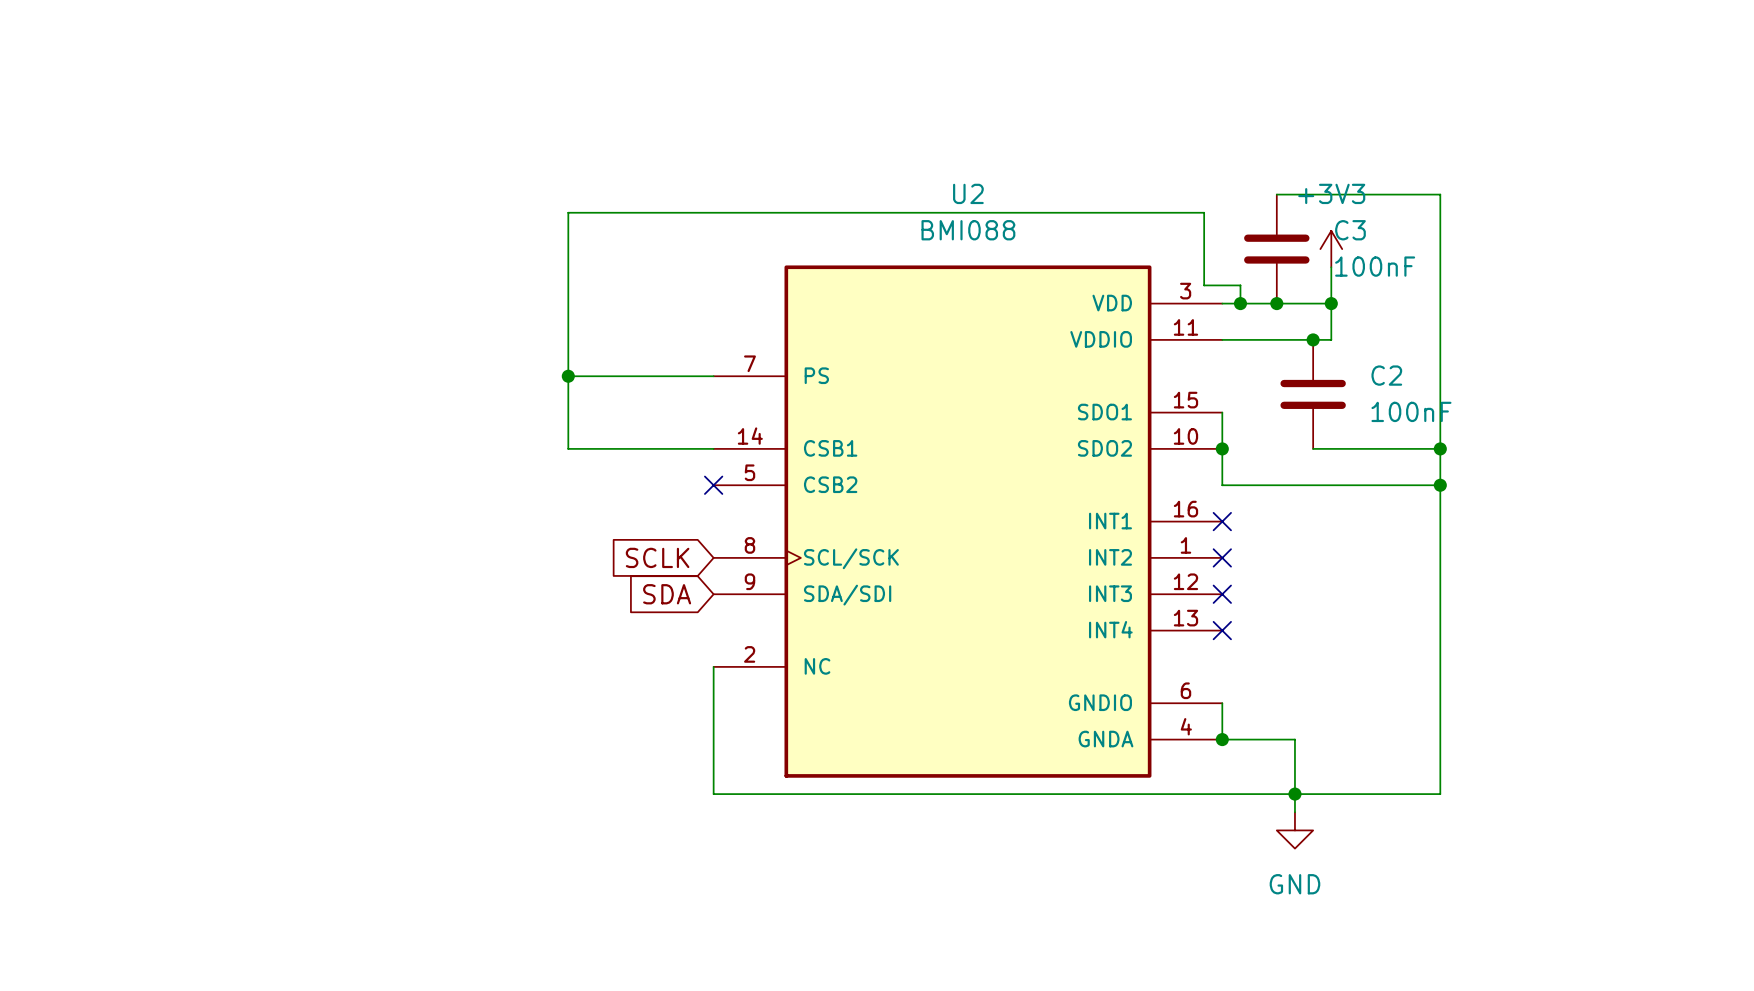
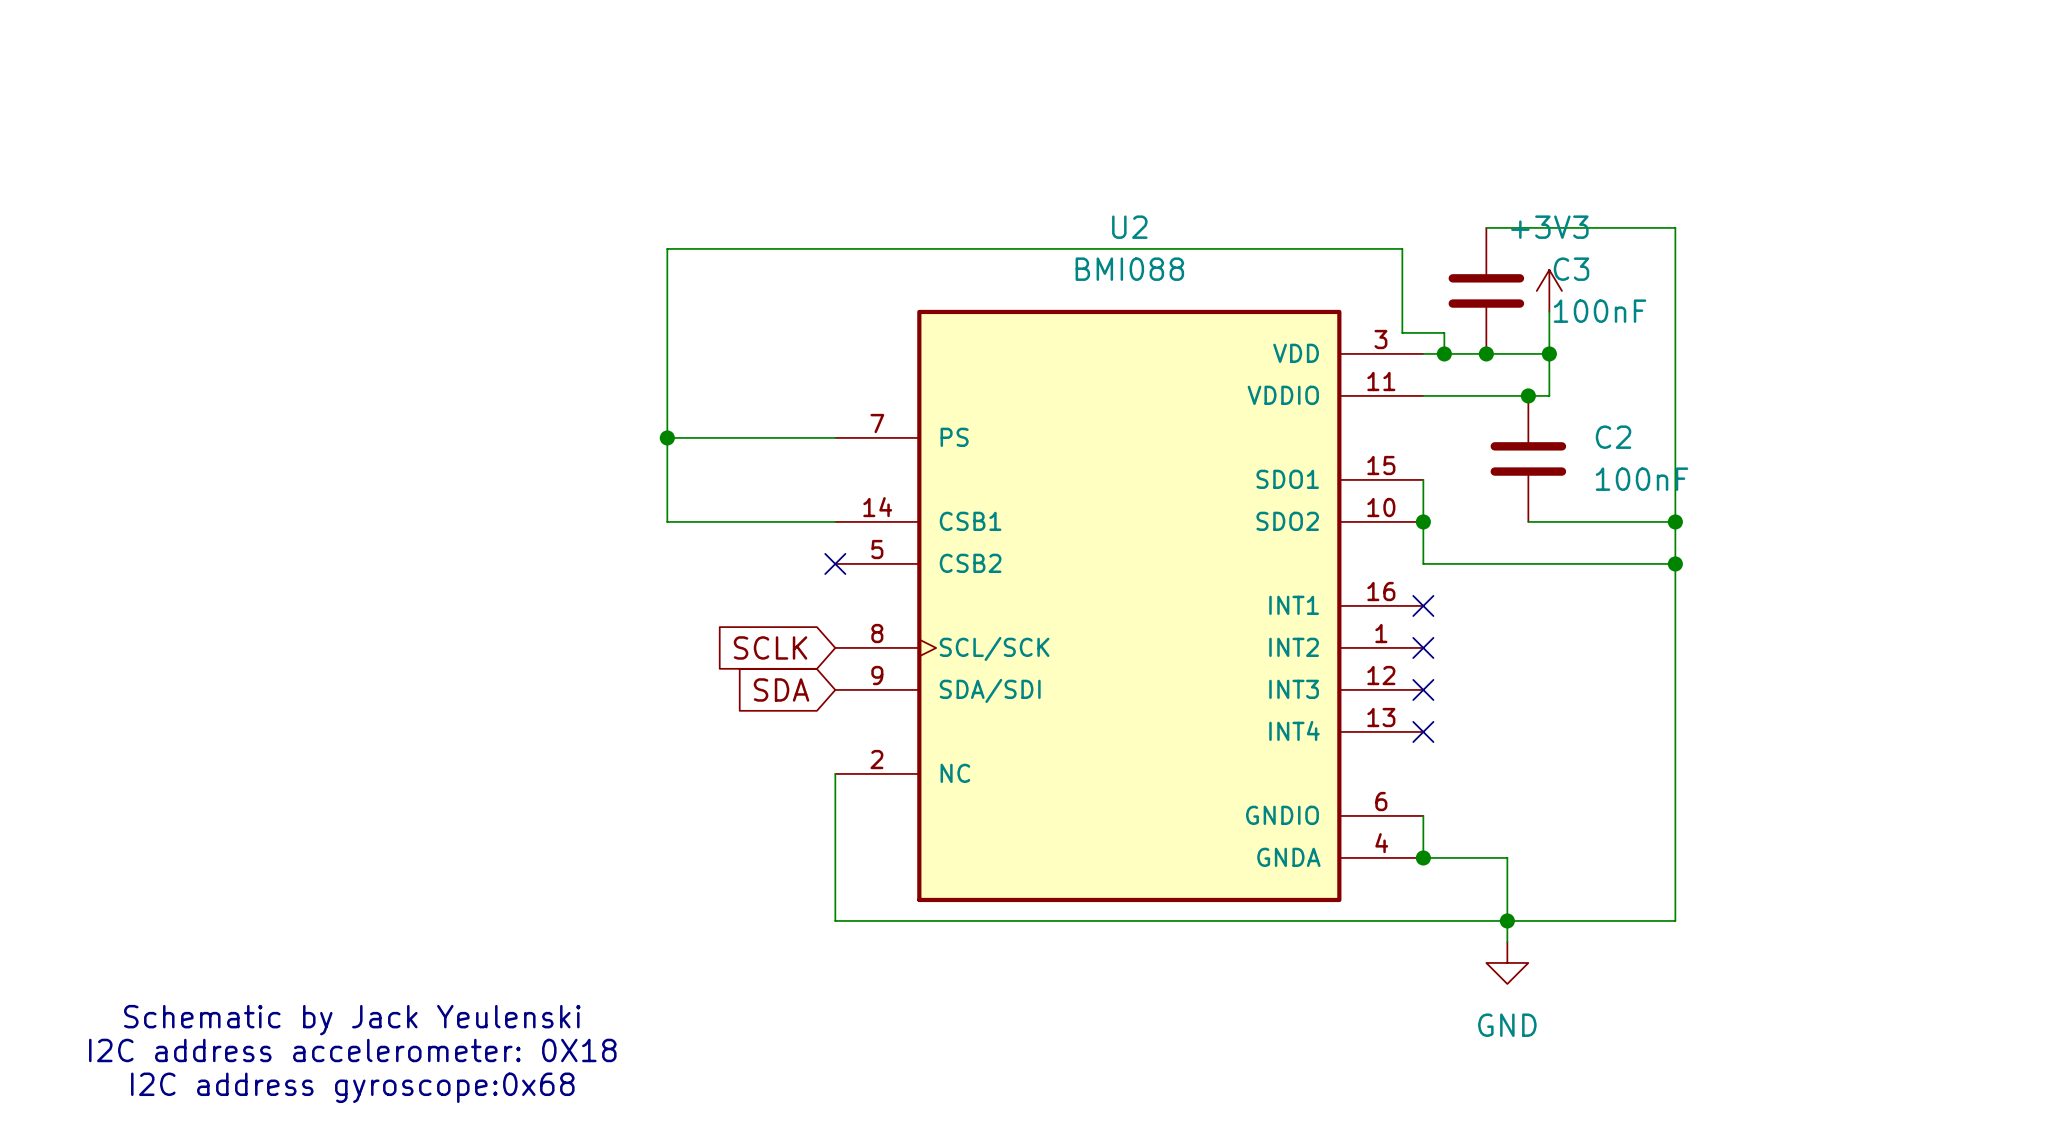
text: none -> Schematic by Jack Yeulenski (352, 1020)
text: none -> I2C address accelerometer: 0X18 (352, 1050)
text: none -> I2C address gyroscope:0x68 (352, 1087)

